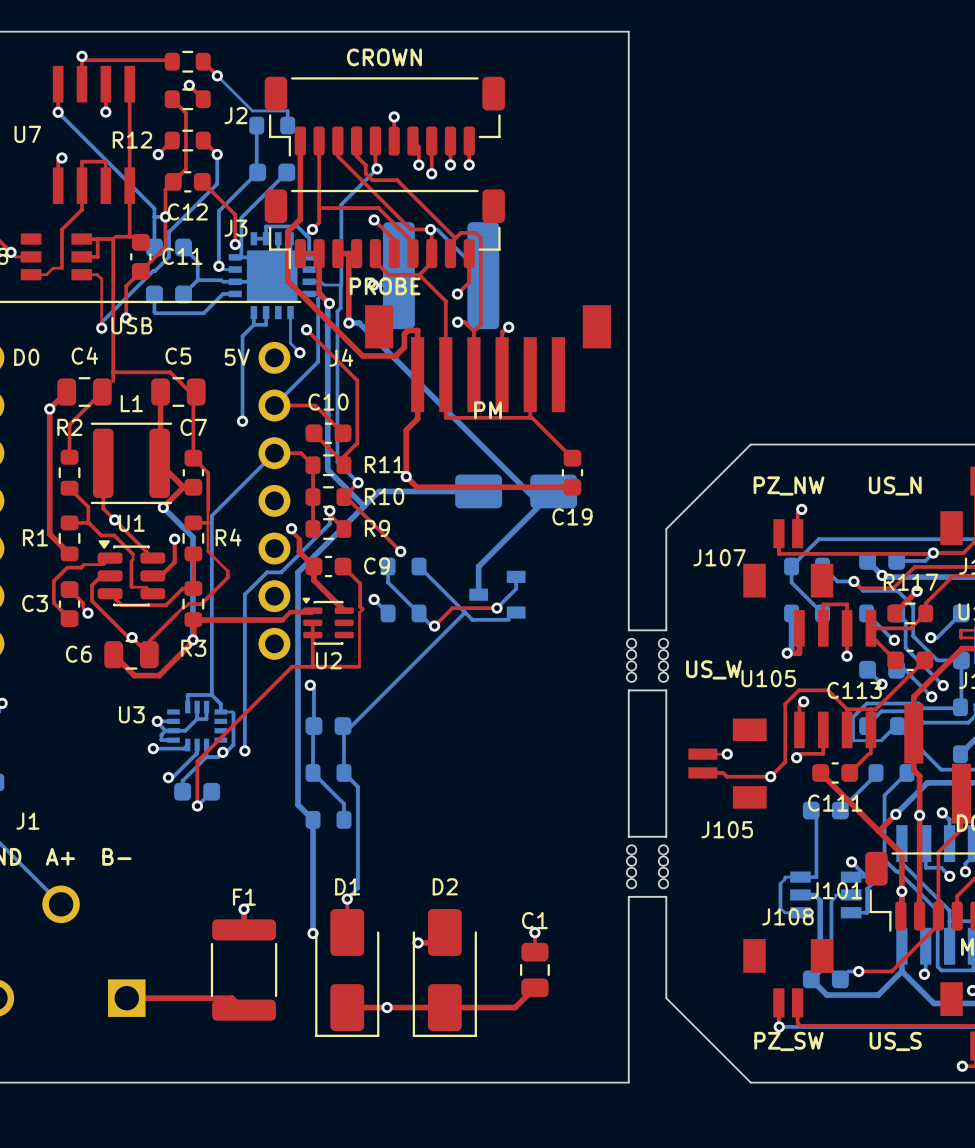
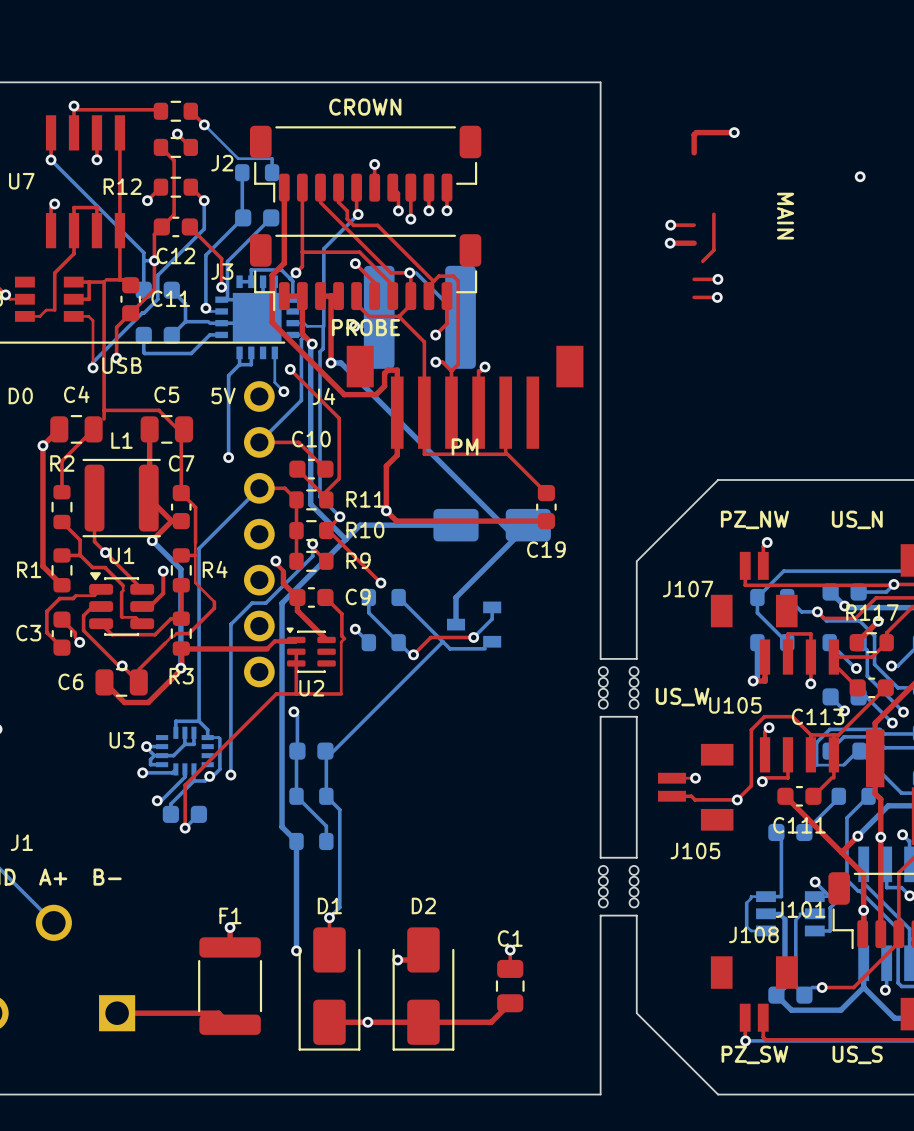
top track: none -> (734, 132) (696, 132) (694, 134) (694, 152)
via: none -> (734, 132)
via: none -> (860, 176)
top track: none -> (713, 214) (713, 250) (702, 261)
text: none -> MAIN (785, 216)
top track: none -> (670, 225) (694, 225)
via: none -> (670, 225)
top track: none -> (670, 243) (694, 243)
via: none -> (670, 243)
top track: none -> (694, 279) (717, 279)
via: none -> (717, 279)
top track: none -> (694, 297) (717, 297)
via: none -> (717, 297)

